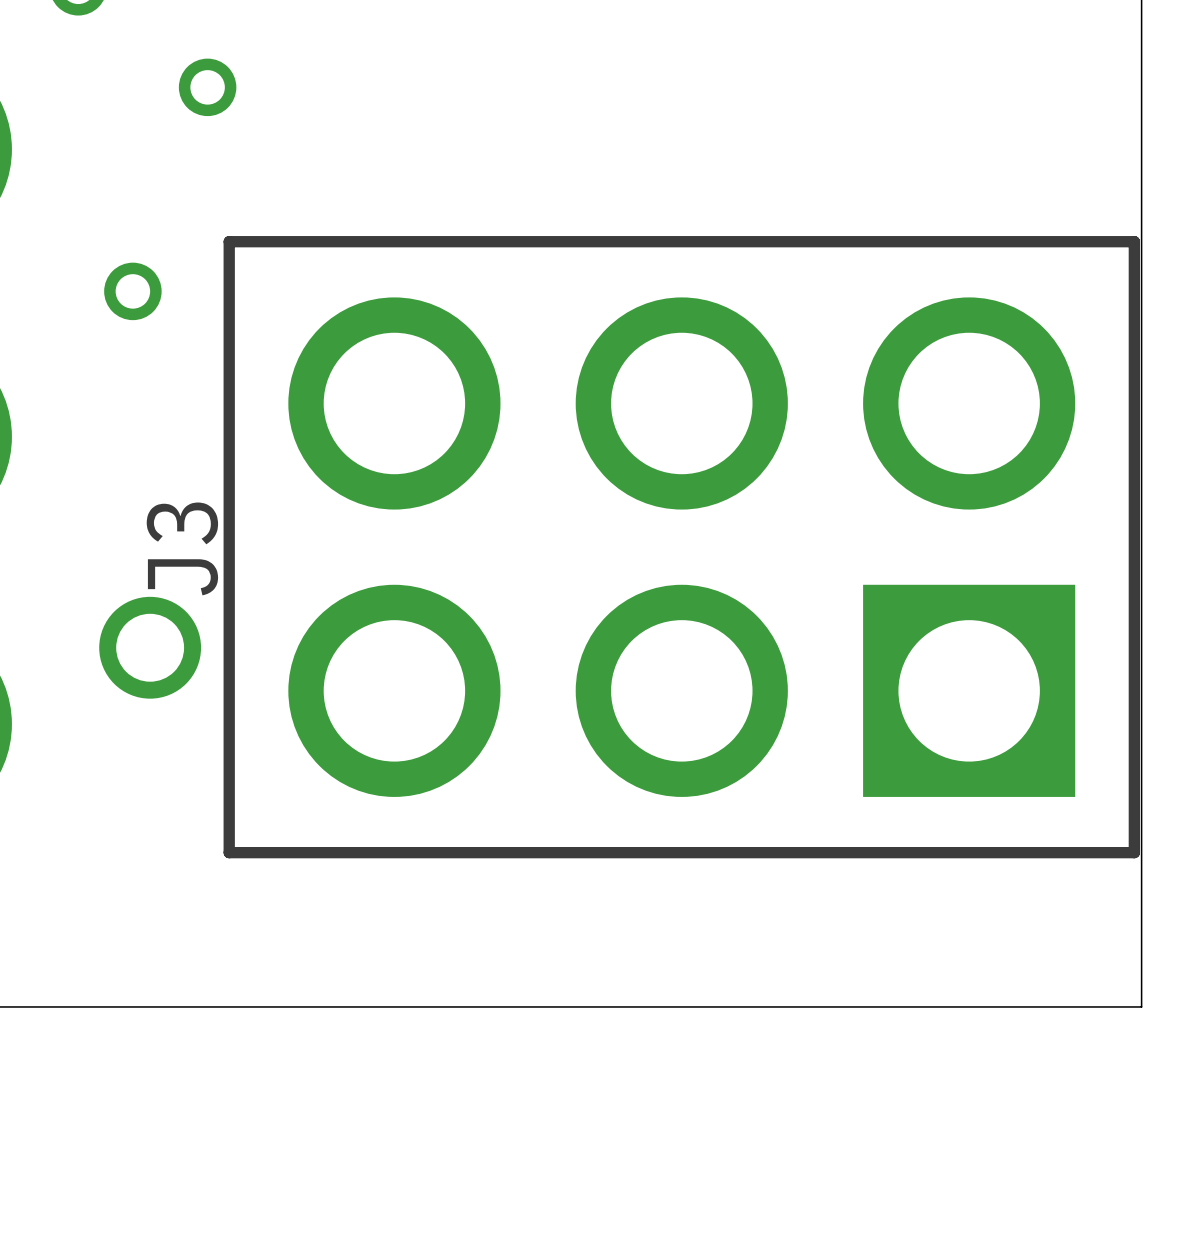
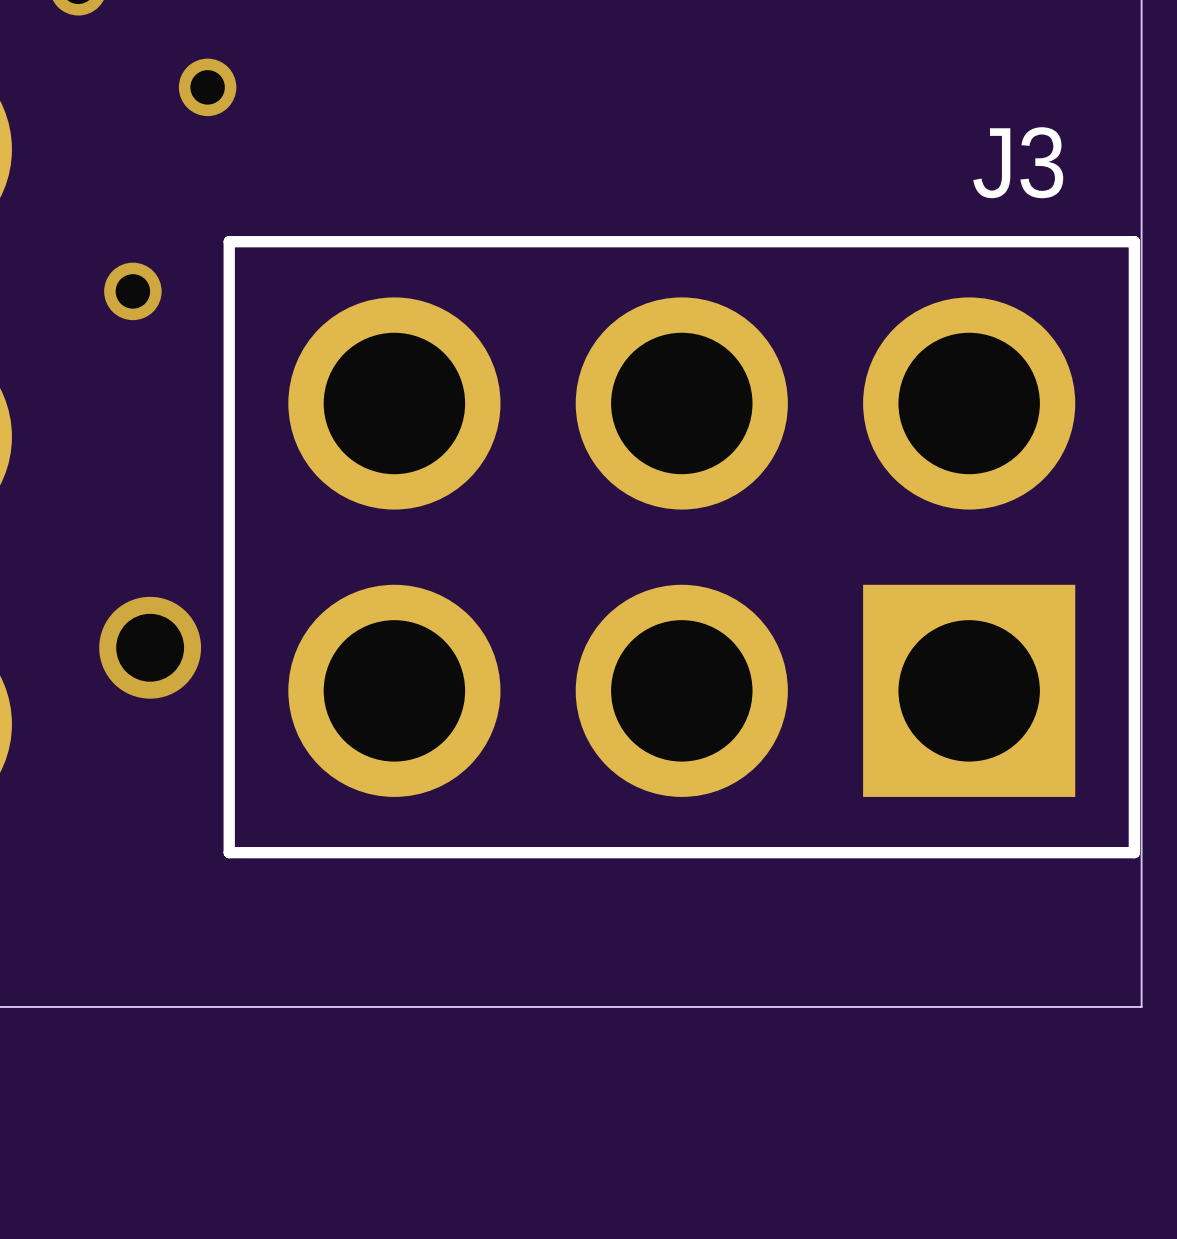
J3 name rotation: 0° (182, 548) -> 90° clockwise (1018, 162)
J3 name position: J3 (182, 548) -> J3 (1018, 162)

